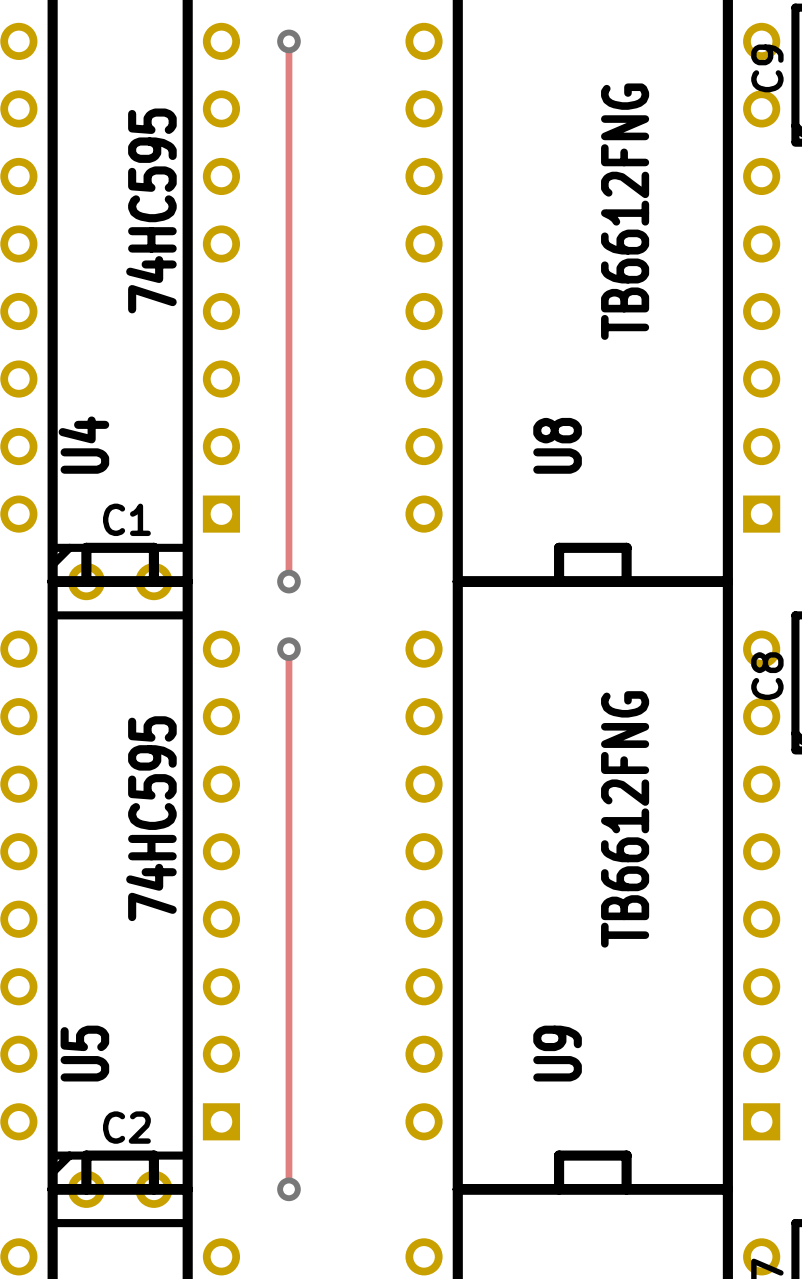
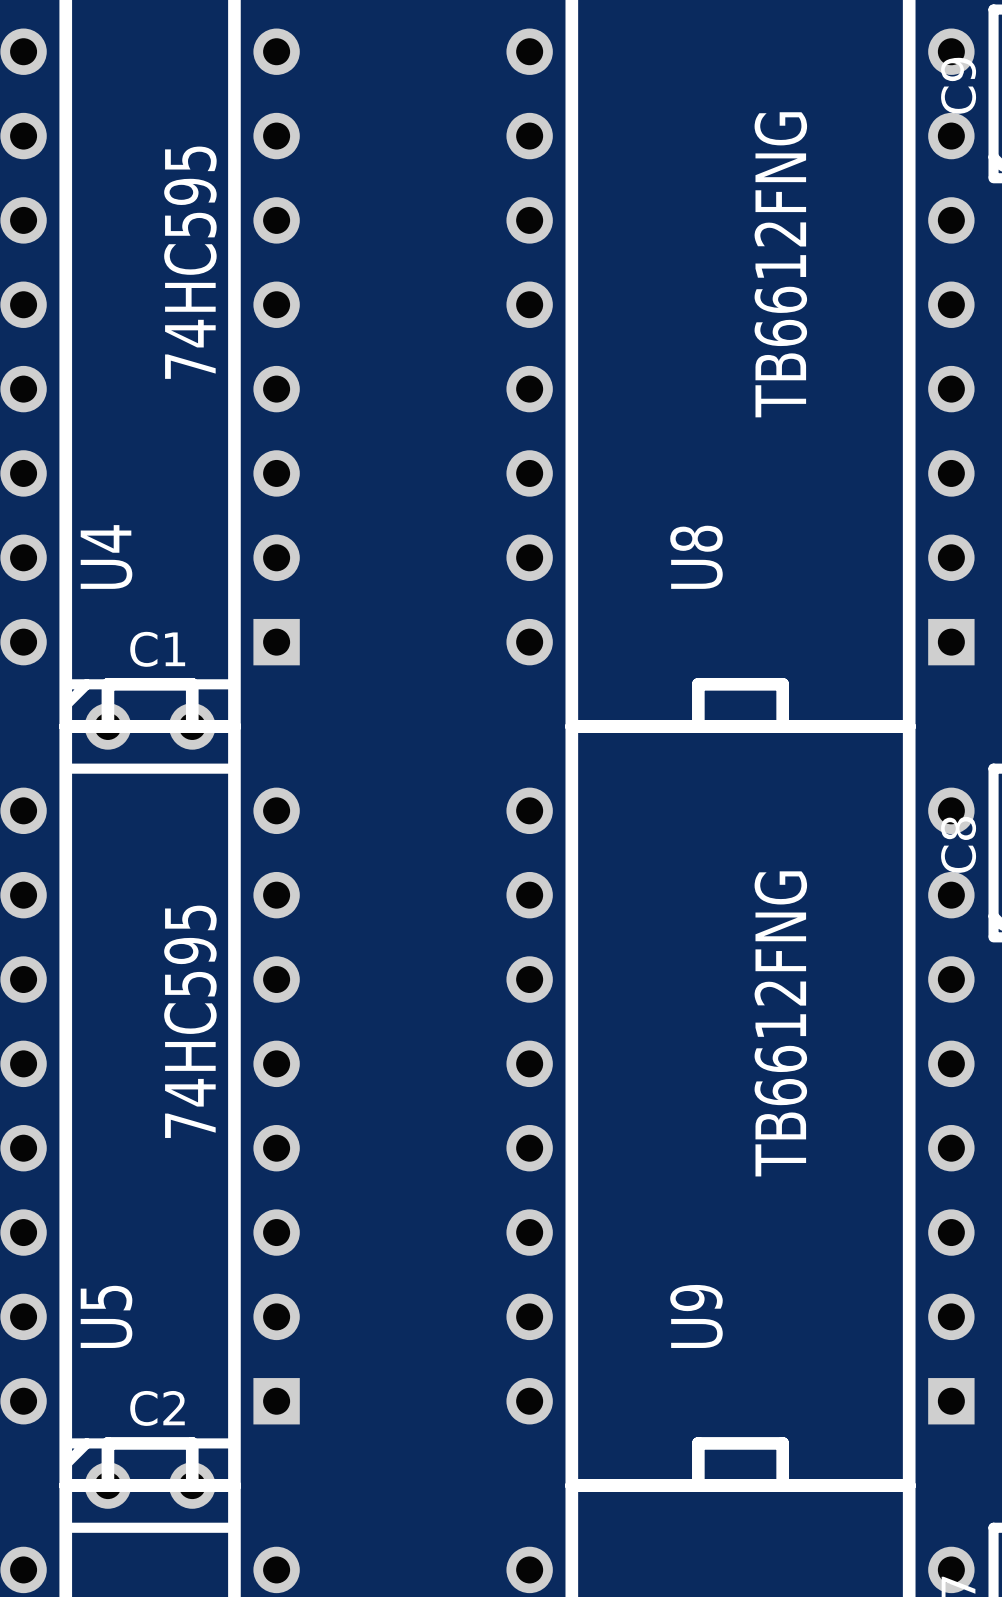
track: (288, 41) (288, 581) -> none
via: (288, 41) -> none
via: (288, 581) -> none
track: (288, 649) (288, 1189) -> none
via: (288, 649) -> none
via: (288, 1189) -> none

